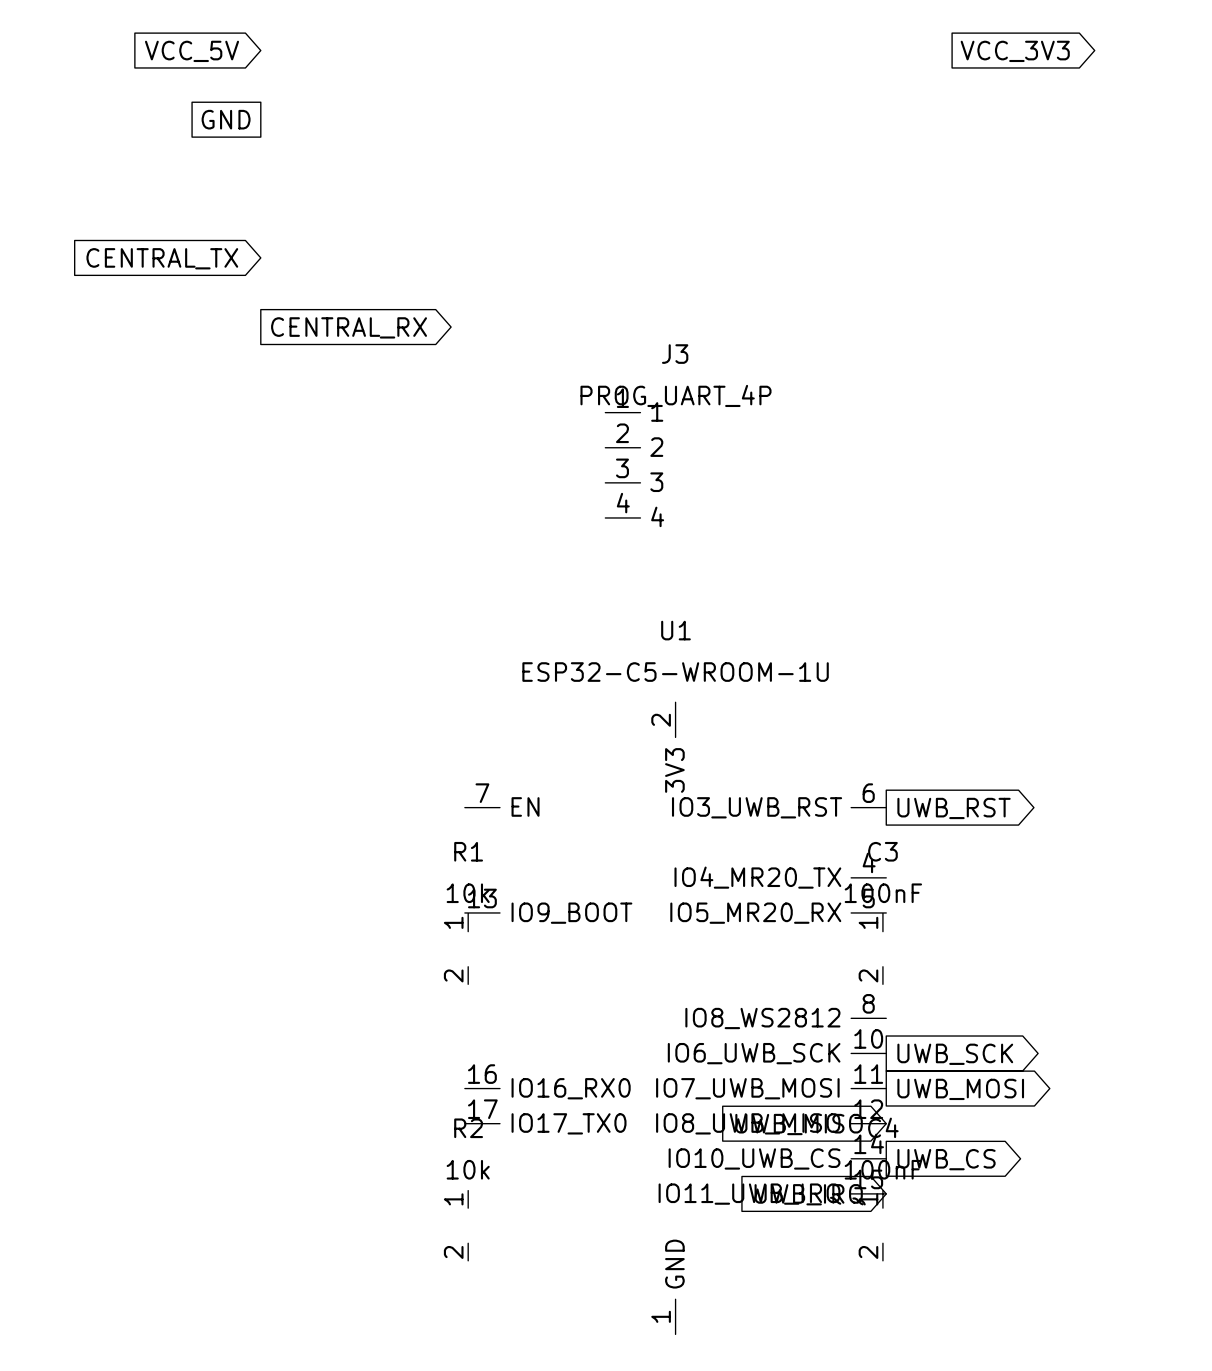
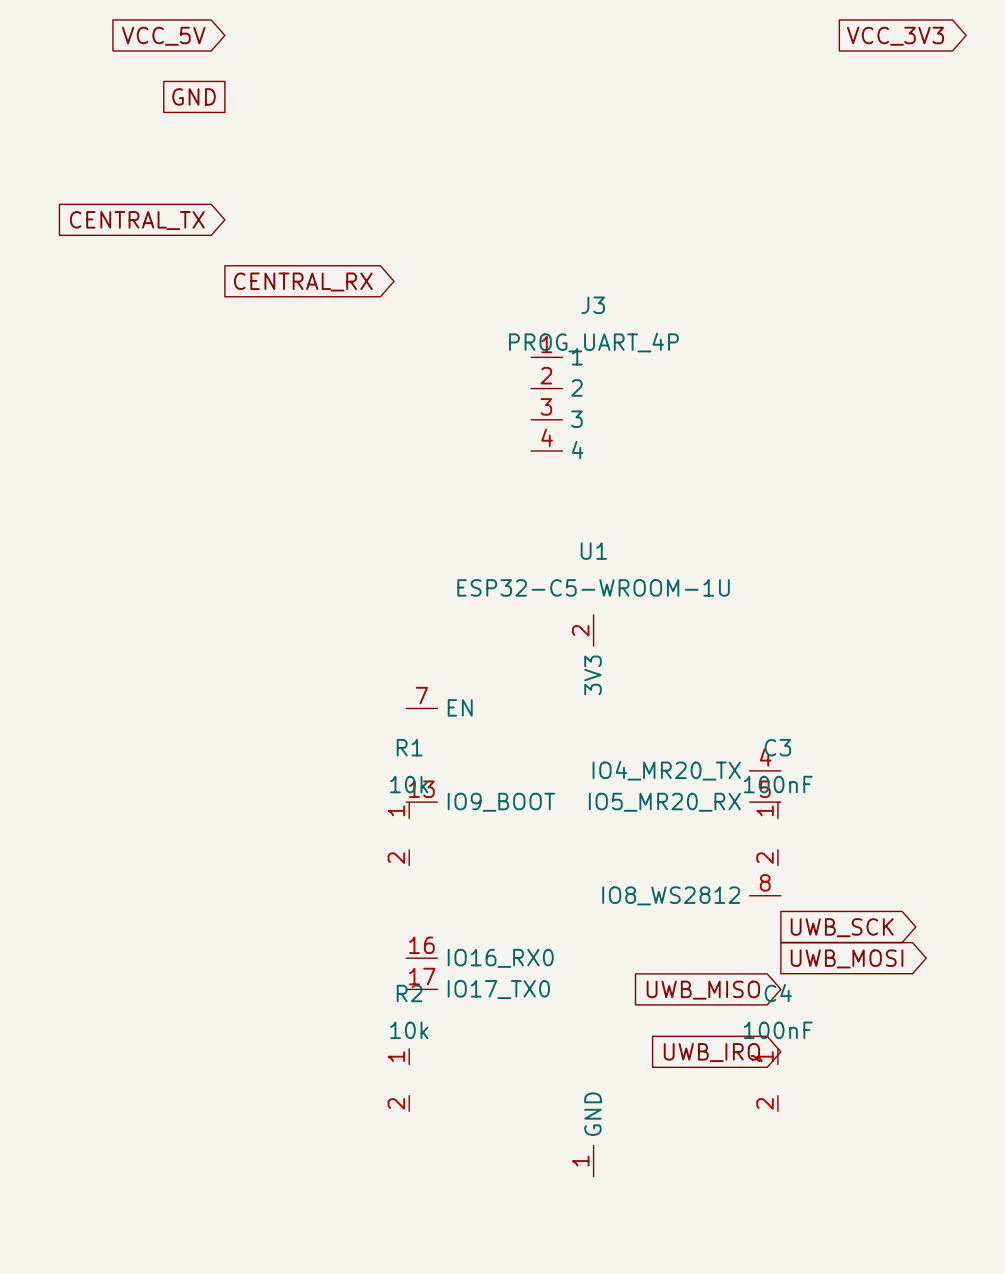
U1 symbol: [464, 702, 887, 1335] -> [406, 614, 781, 1177]
global label: UWB_RST (954, 808) -> none
global label: UWB_CS (946, 1159) -> none

